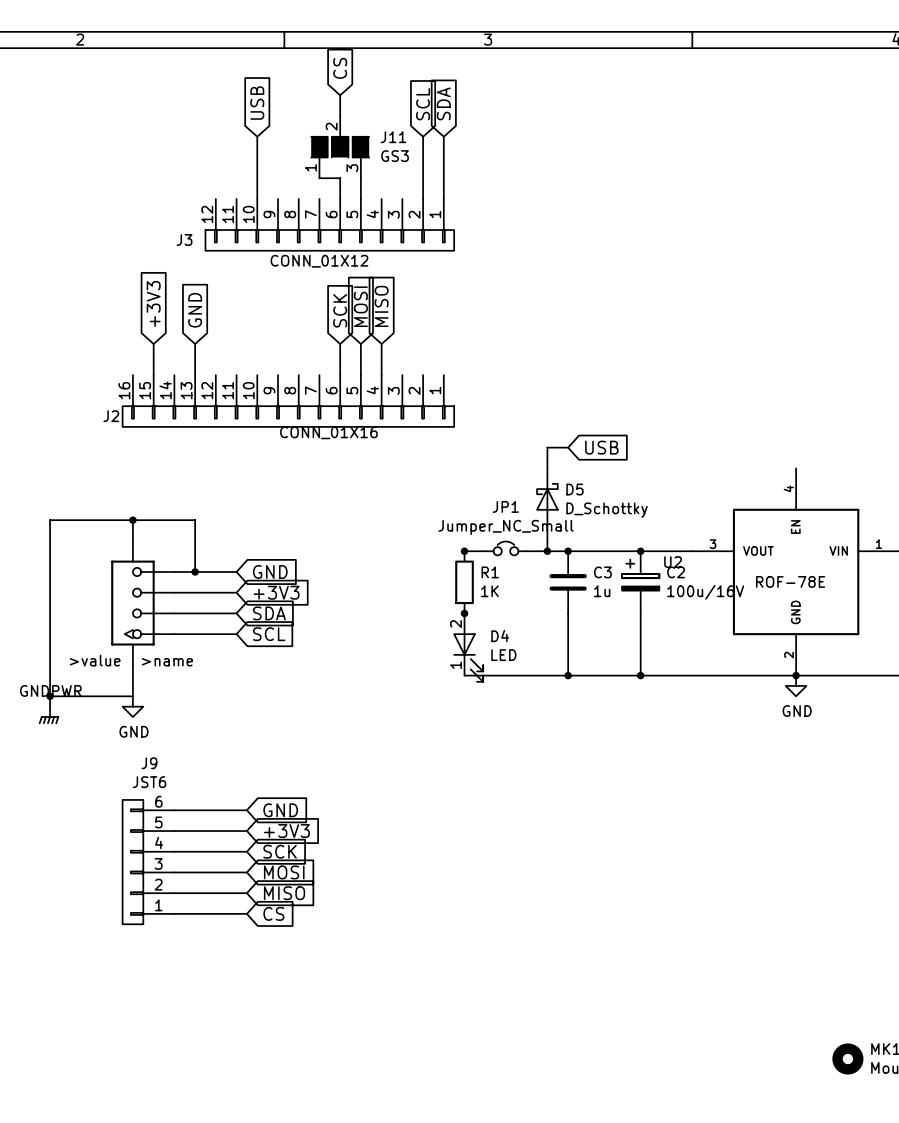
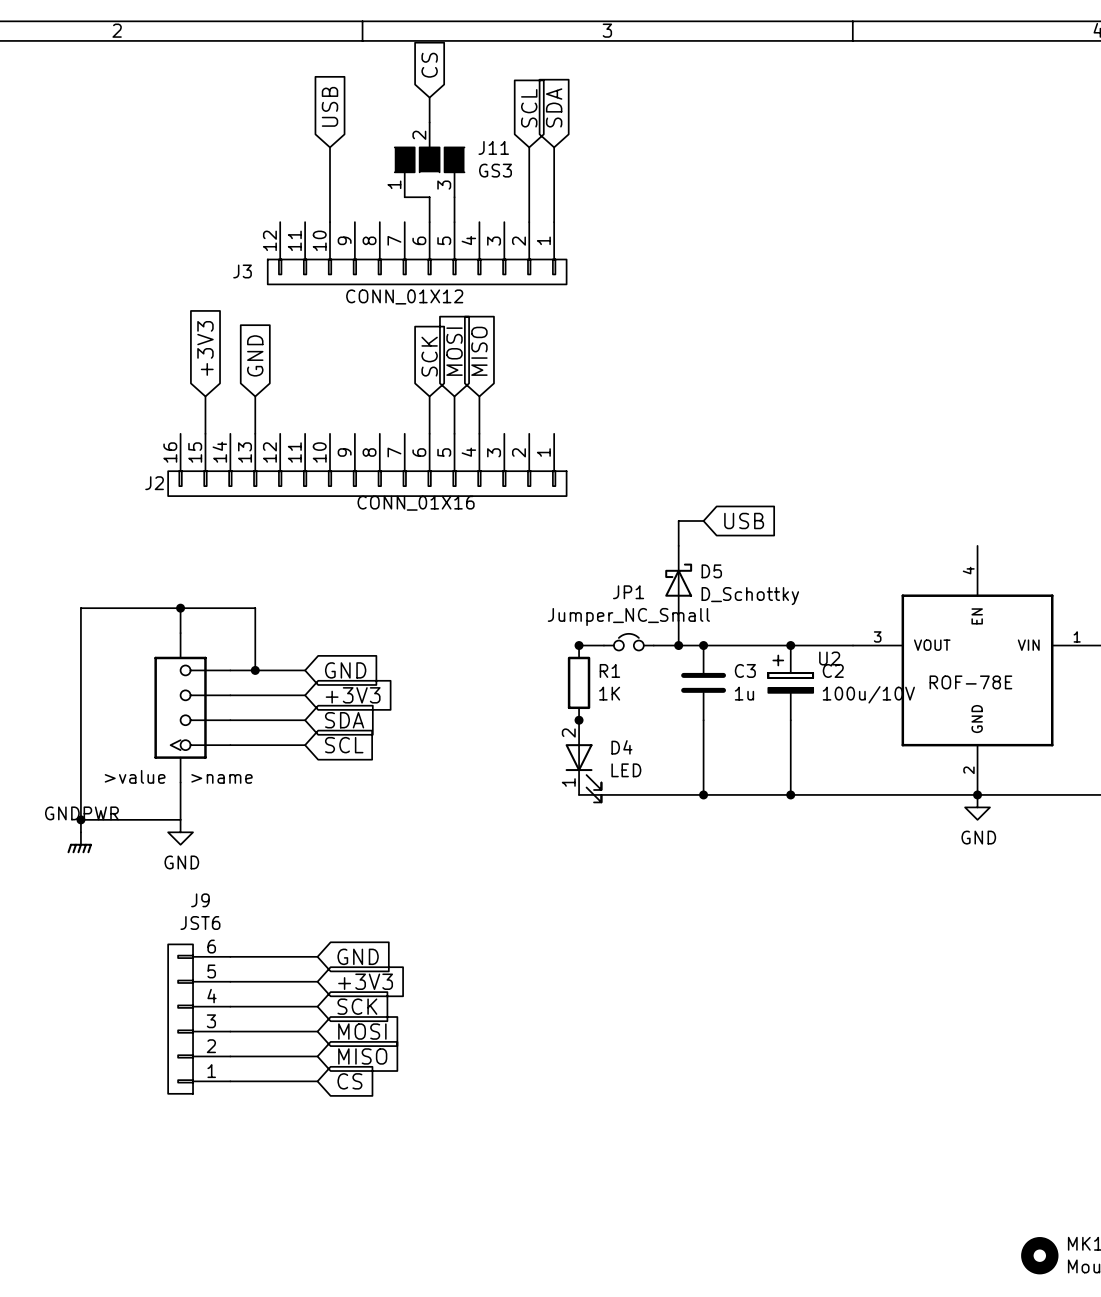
C2 value: 100u/16V (705, 592) -> 100u/10V (868, 694)

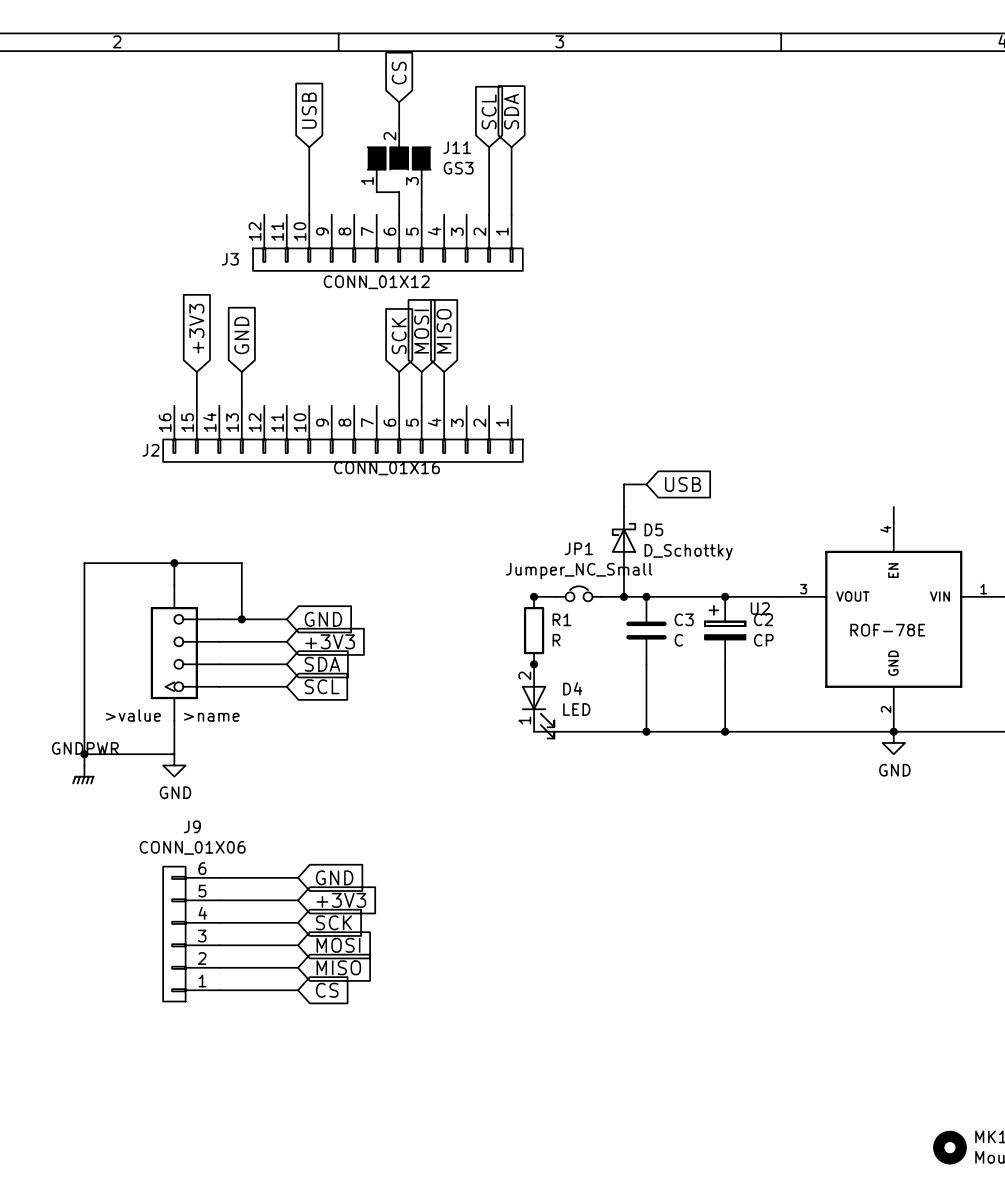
R1 value: 1K (609, 693) -> R (556, 640)
C3 value: 1u (744, 693) -> C (678, 640)
C2 value: 100u/10V (868, 694) -> CP (763, 640)
J9 value: JST6 (200, 923) -> CONN_01X06 (192, 847)

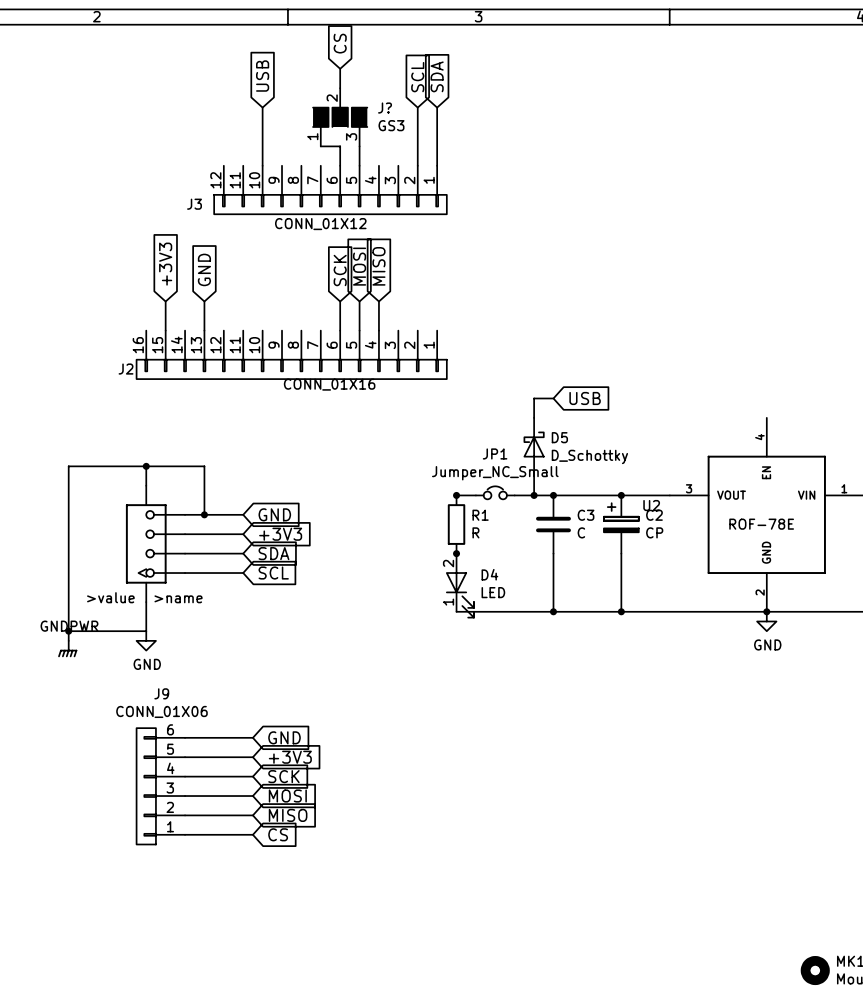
J11 name: J11 (457, 147) -> J? (385, 108)

